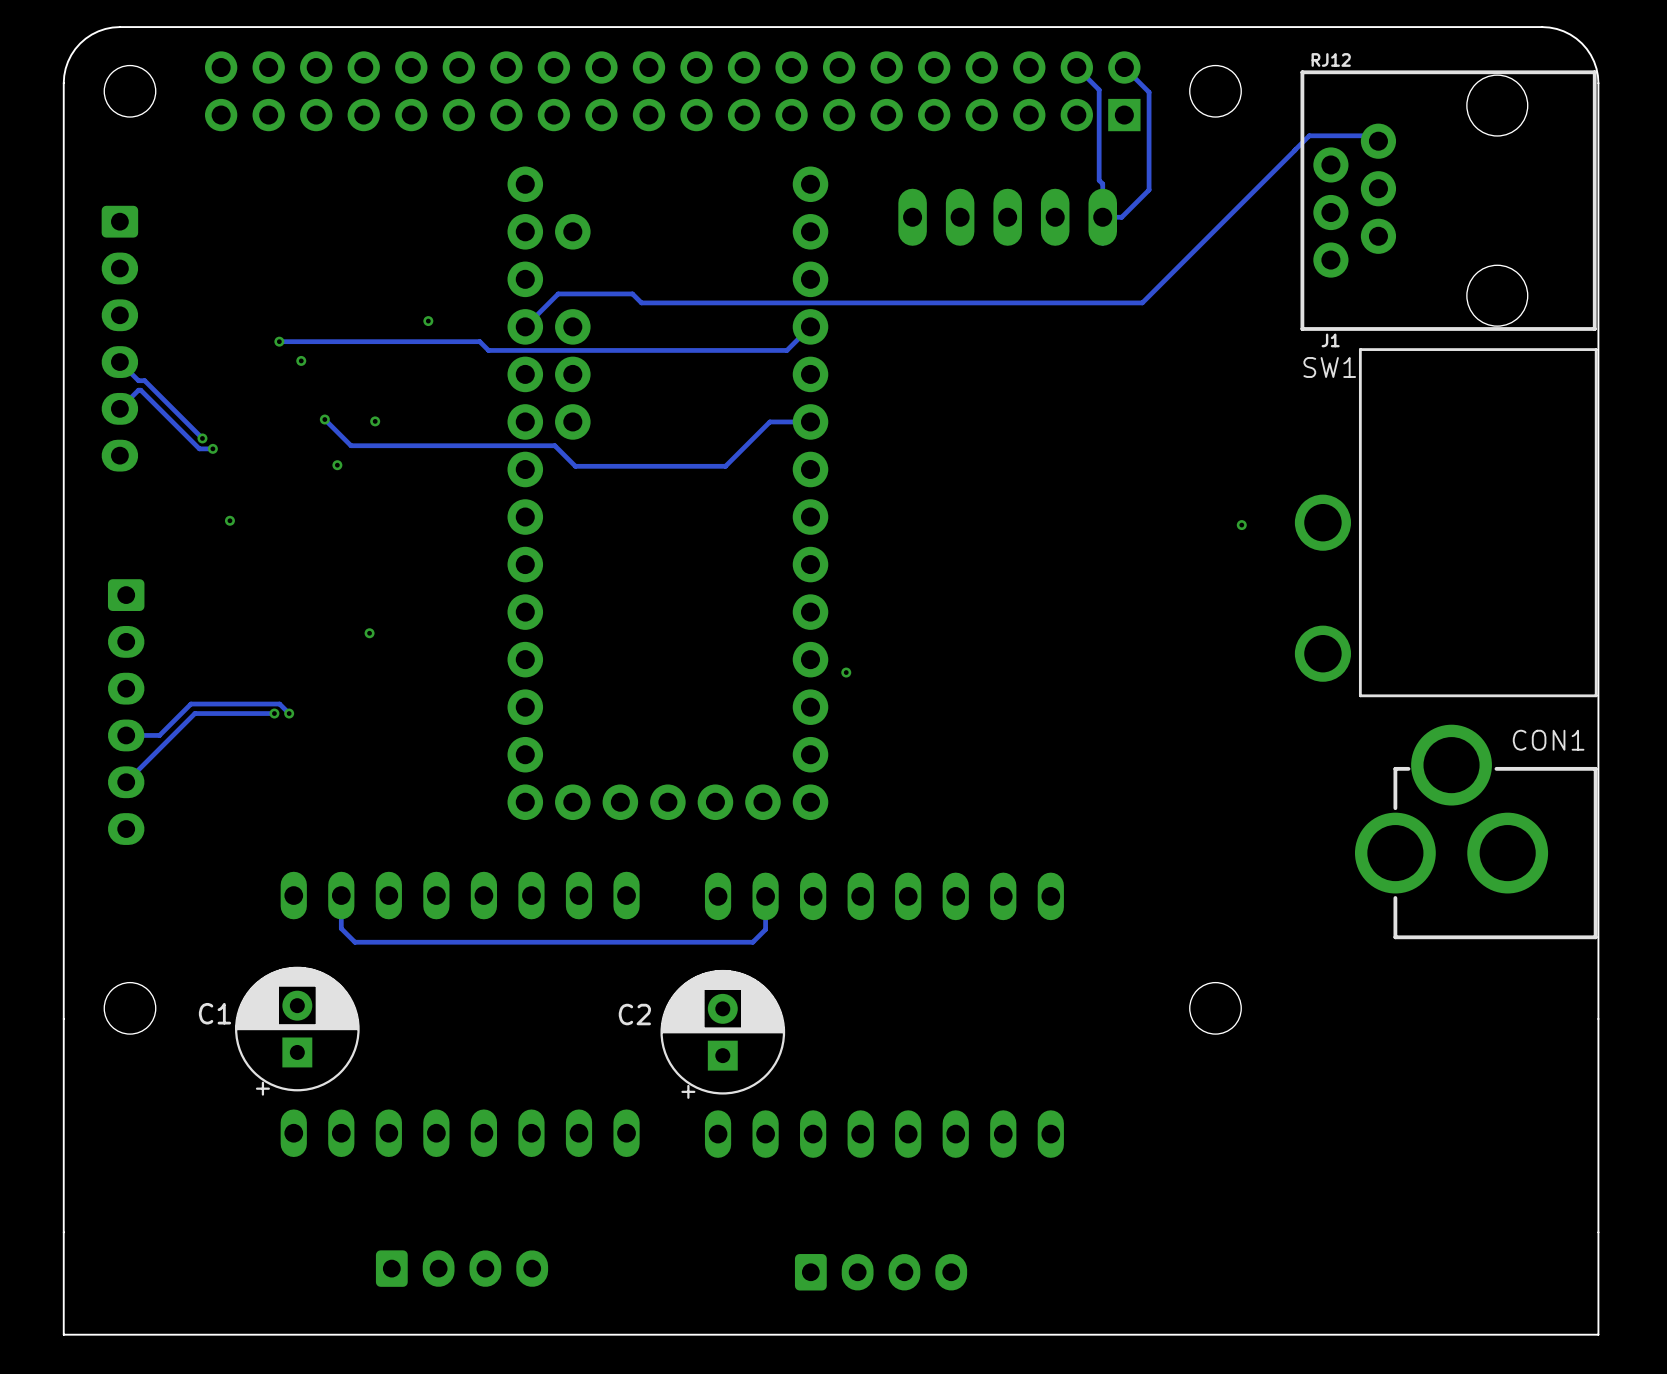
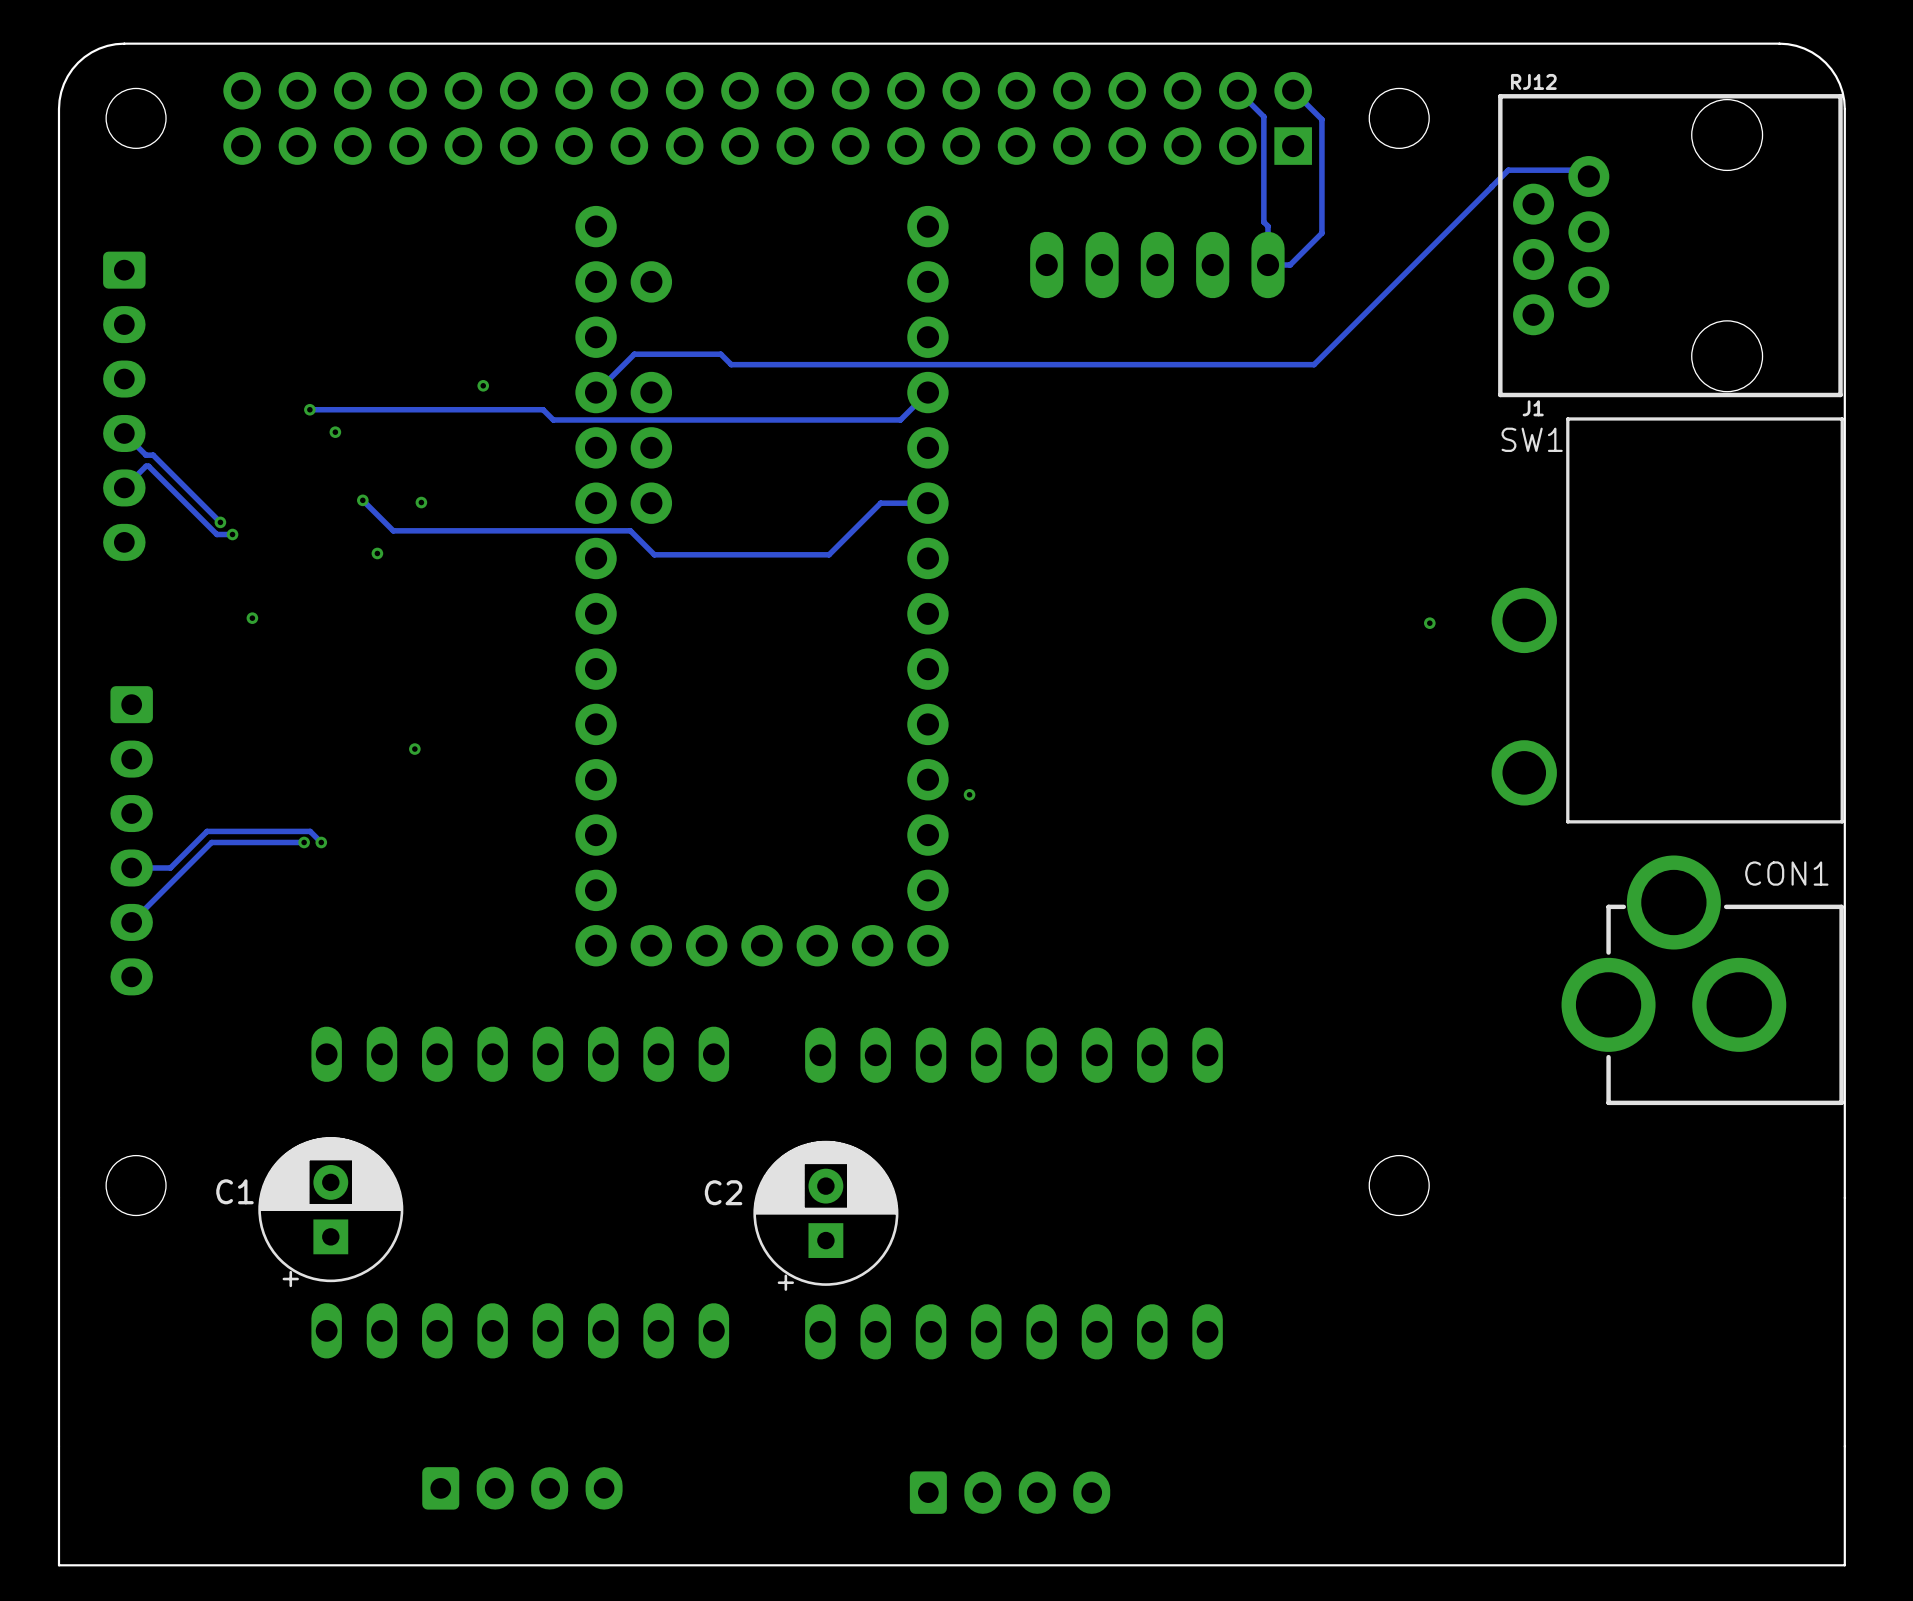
track: (341, 895) (341, 928) (354, 942) (752, 942) (765, 929) (765, 896) -> none

